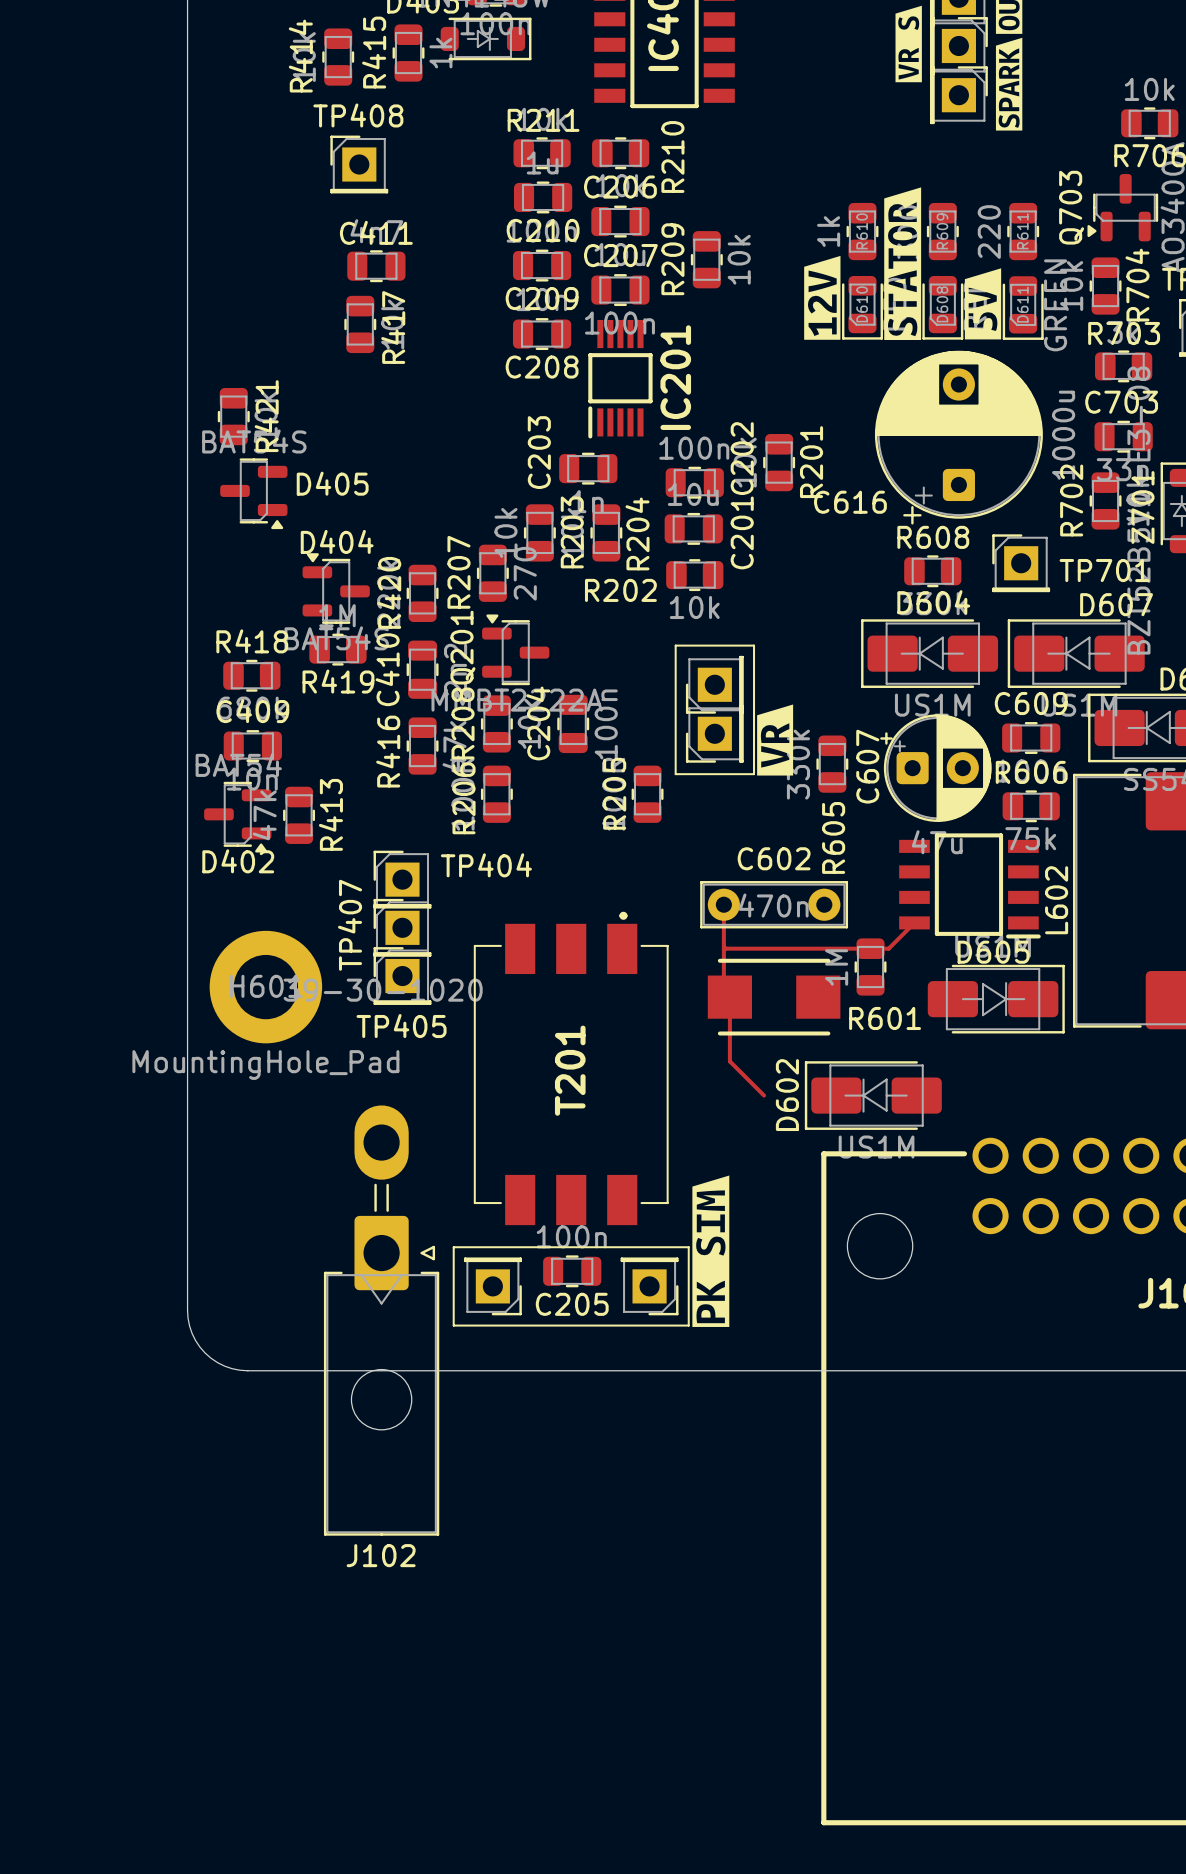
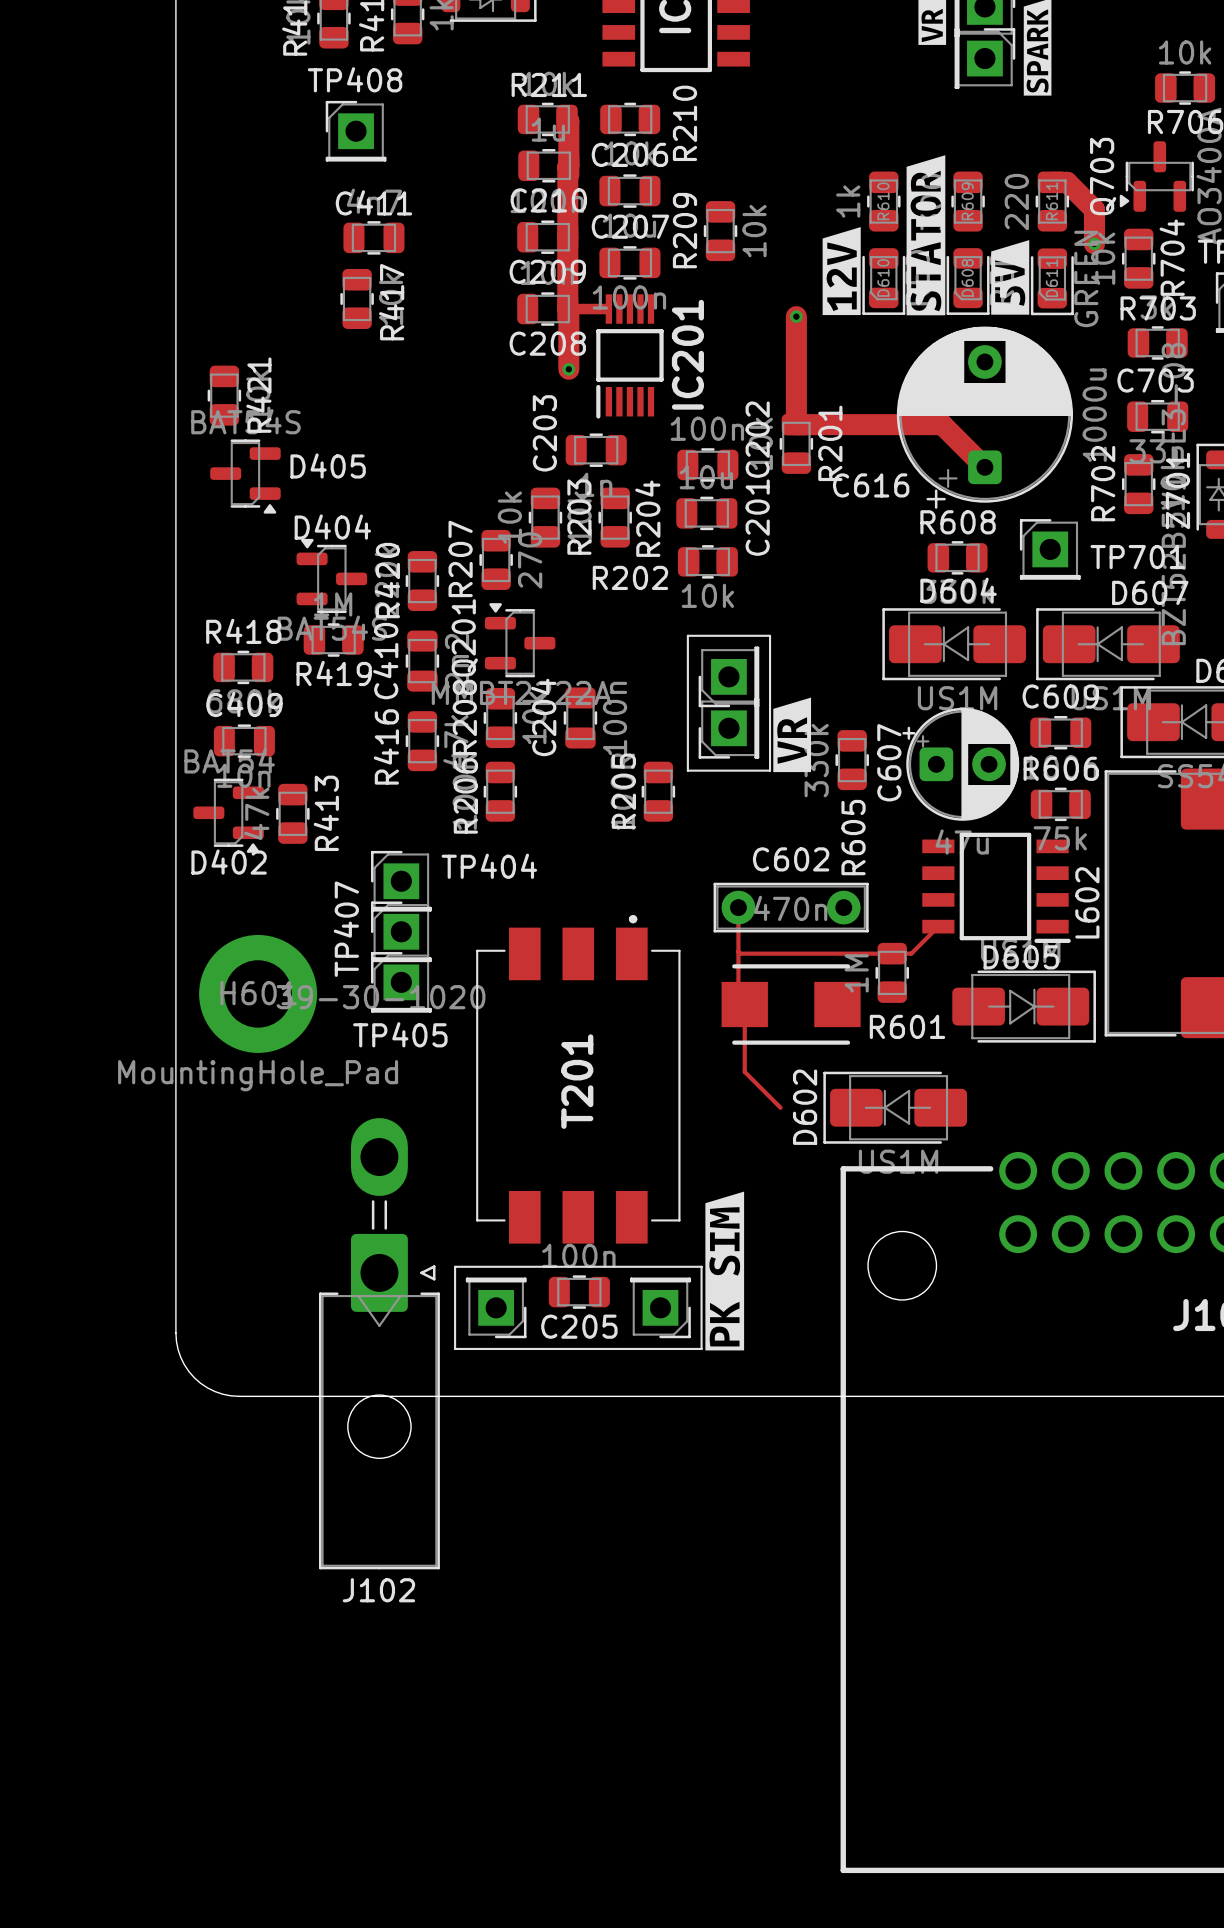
track: none -> (567, 119) (568, 121) (567, 309)
track: none -> (1052, 182) (1067, 182) (1094, 209) (1094, 243)
via: none -> (1094, 243)
track: none -> (567, 309) (568, 369)
track: none -> (567, 309) (606, 309)
track: none -> (796, 316) (796, 424) (942, 424) (984, 467)
via: none -> (796, 316)
via: none -> (568, 369)

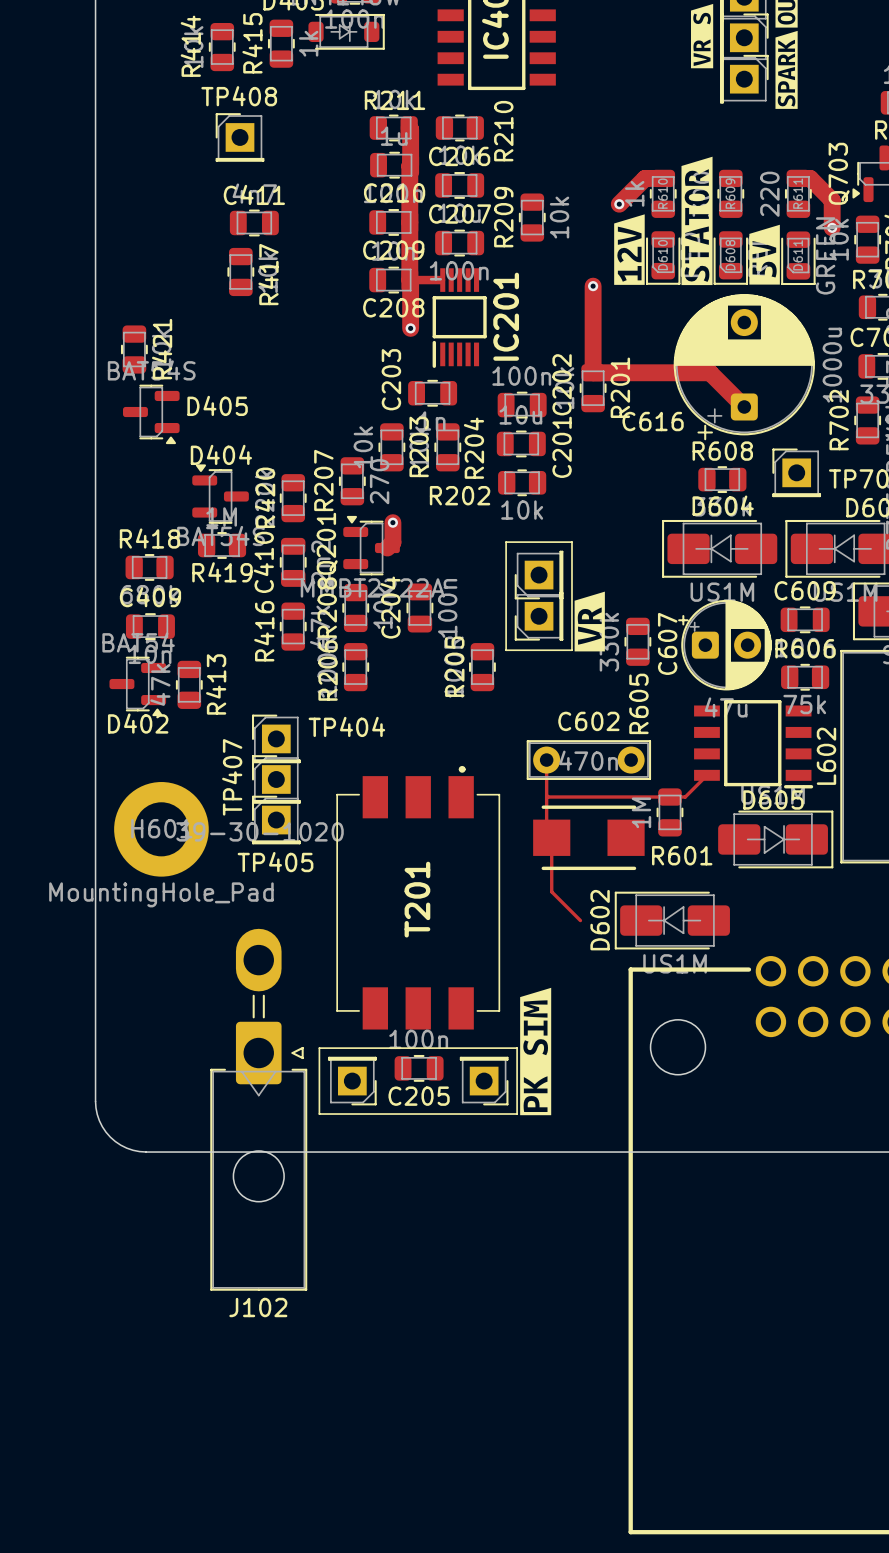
track: none -> (663, 178) (645, 178) (619, 204)
via: none -> (619, 204)
track: none -> (392, 522) (392, 542) (387, 548)
via: none -> (392, 522)

